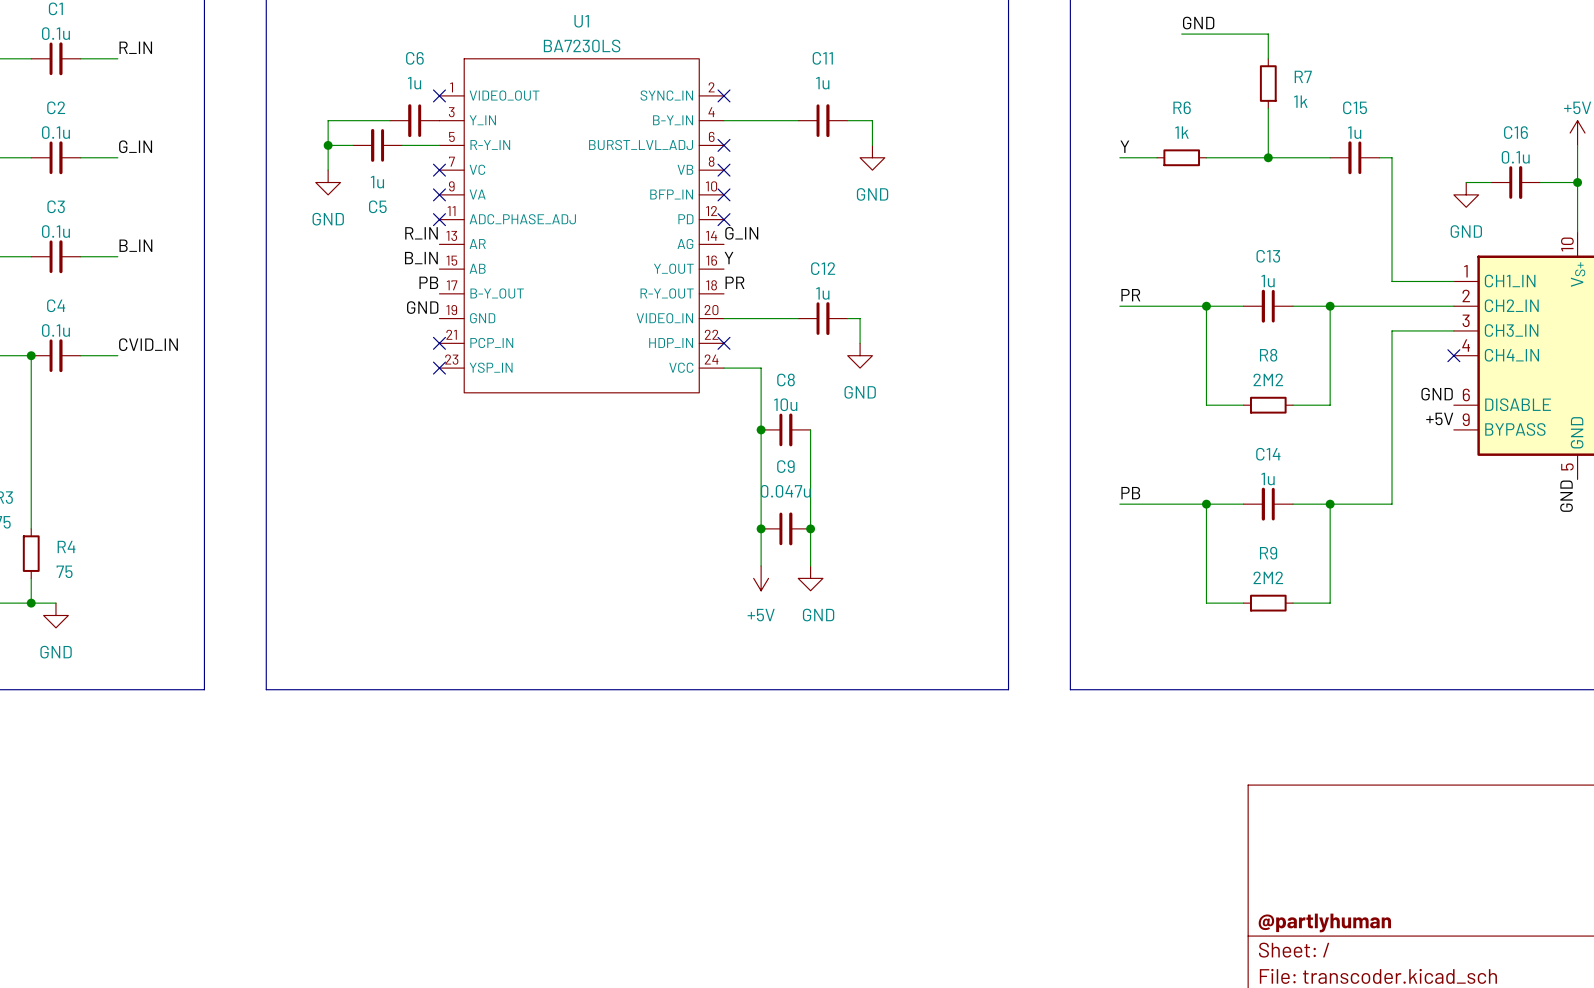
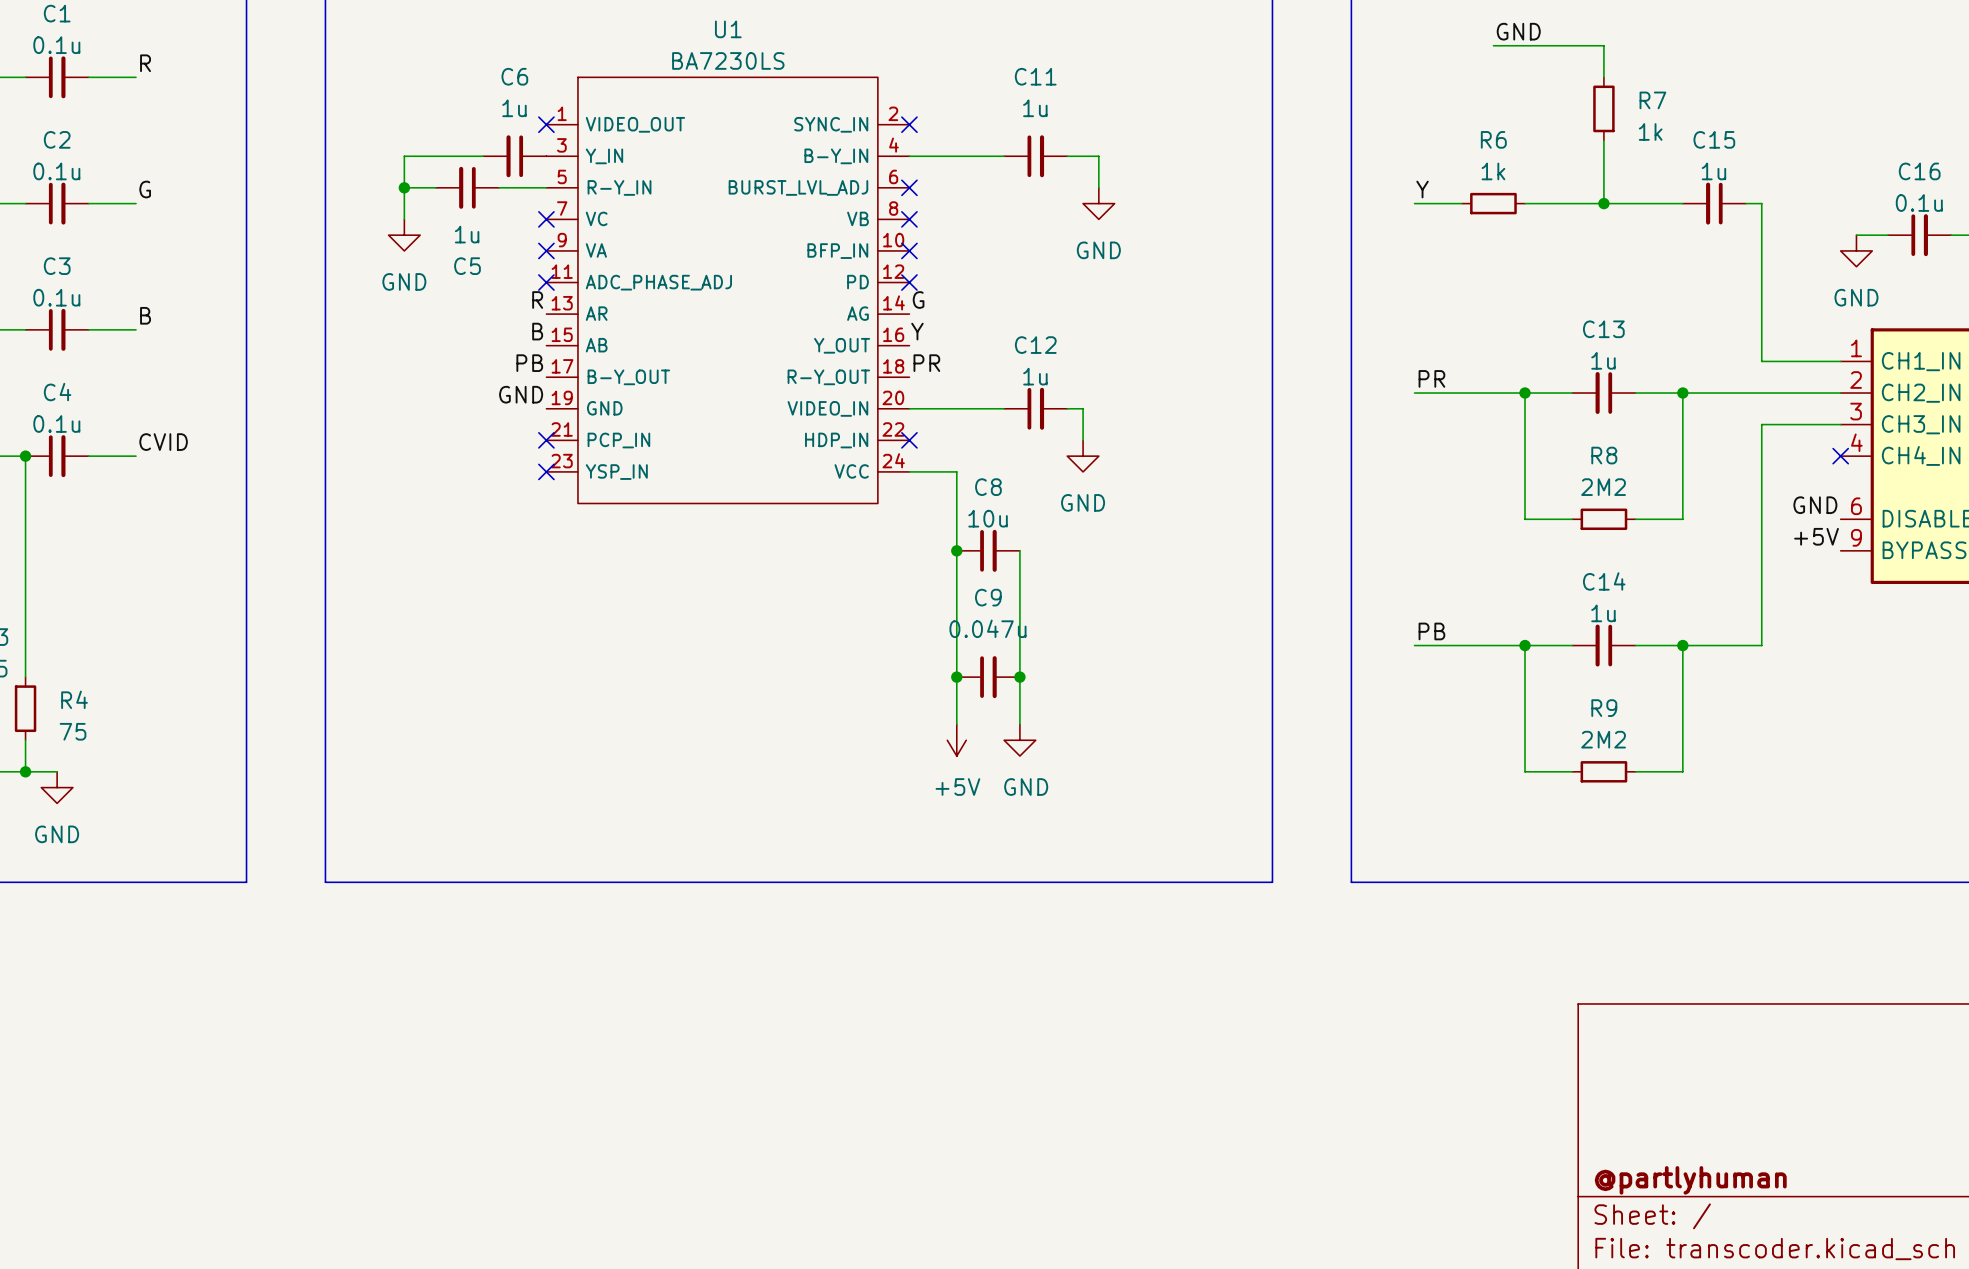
label: R_IN (135, 47) -> R (145, 63)
label: G_IN (135, 146) -> G (145, 189)
label: R_IN (421, 233) -> R (537, 300)
label: G_IN (741, 233) -> G (918, 300)
label: B_IN (135, 245) -> B (145, 315)
label: B_IN (421, 258) -> B (537, 331)
label: CVID_IN (148, 344) -> CVID (163, 442)

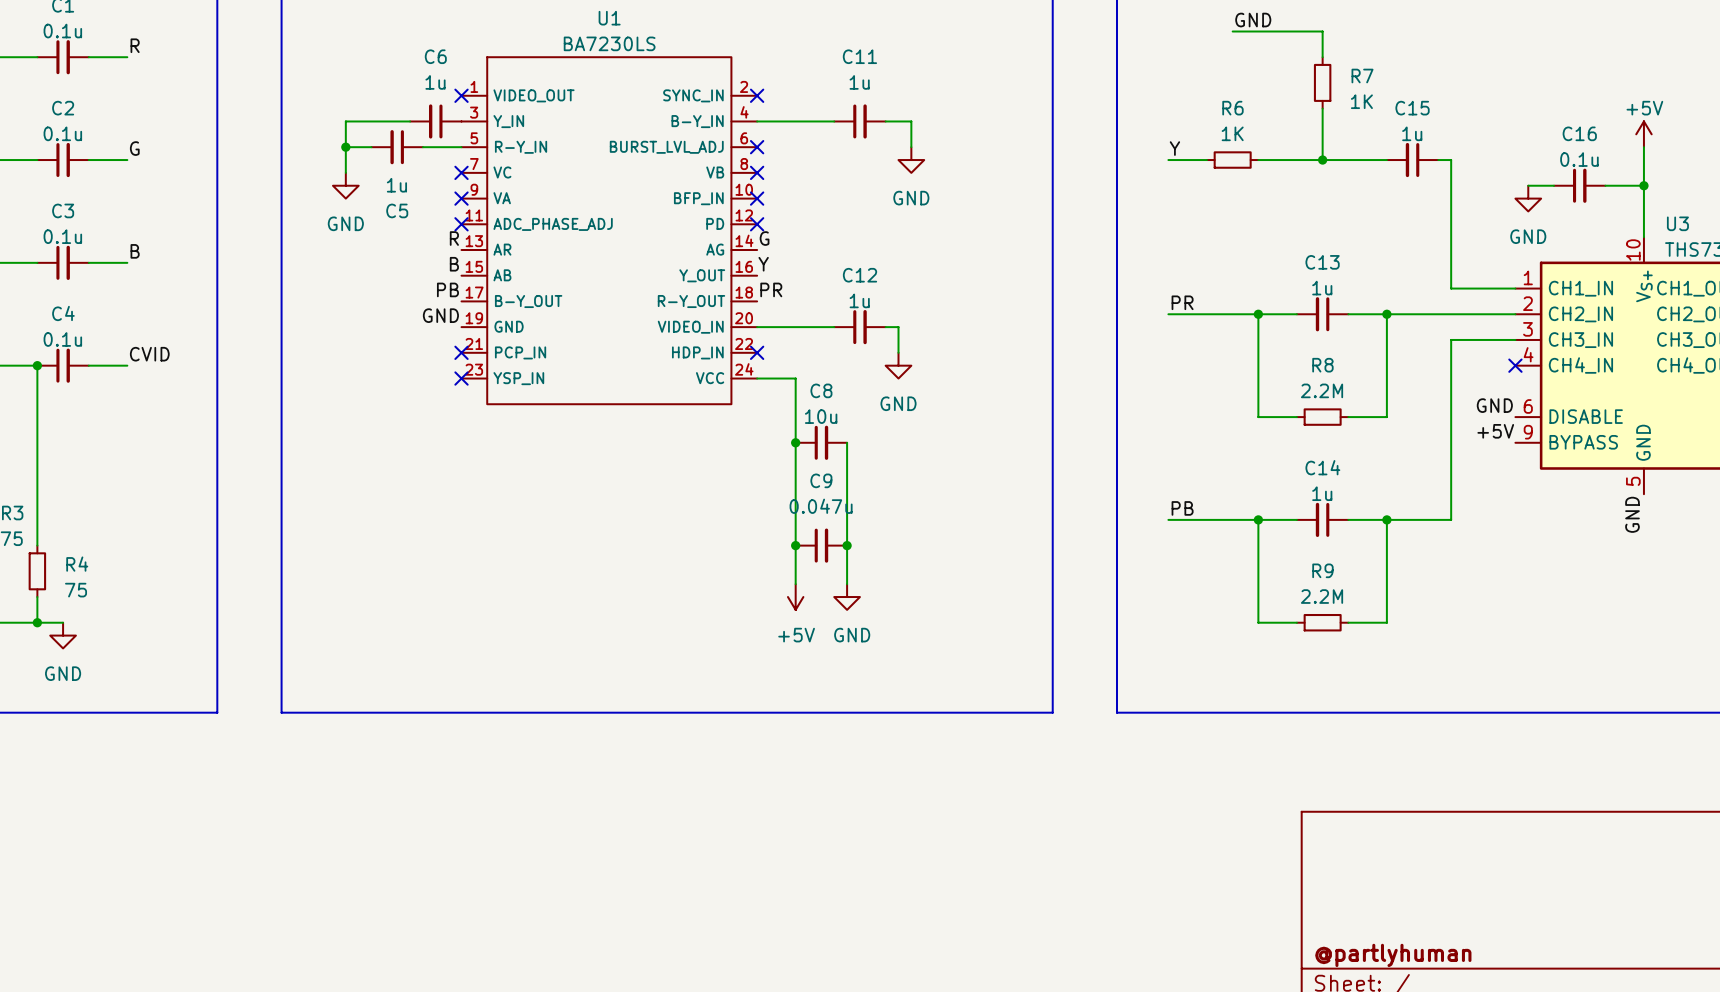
R7 value: 1k (1650, 131) -> 1K (1361, 101)
R6 value: 1k (1493, 171) -> 1K (1232, 133)
R8 value: 2M2 (1603, 487) -> 2.2M (1322, 390)
R9 value: 2M2 (1603, 739) -> 2.2M (1322, 596)

